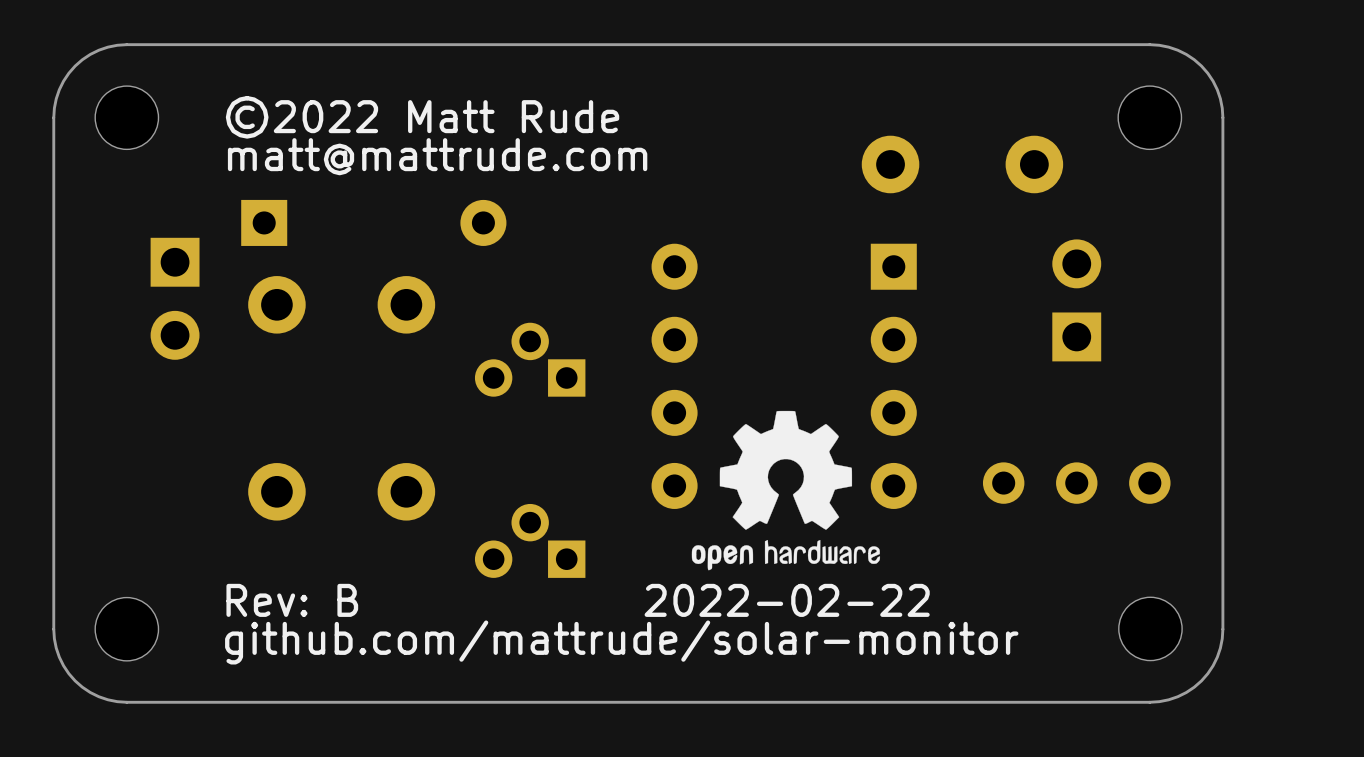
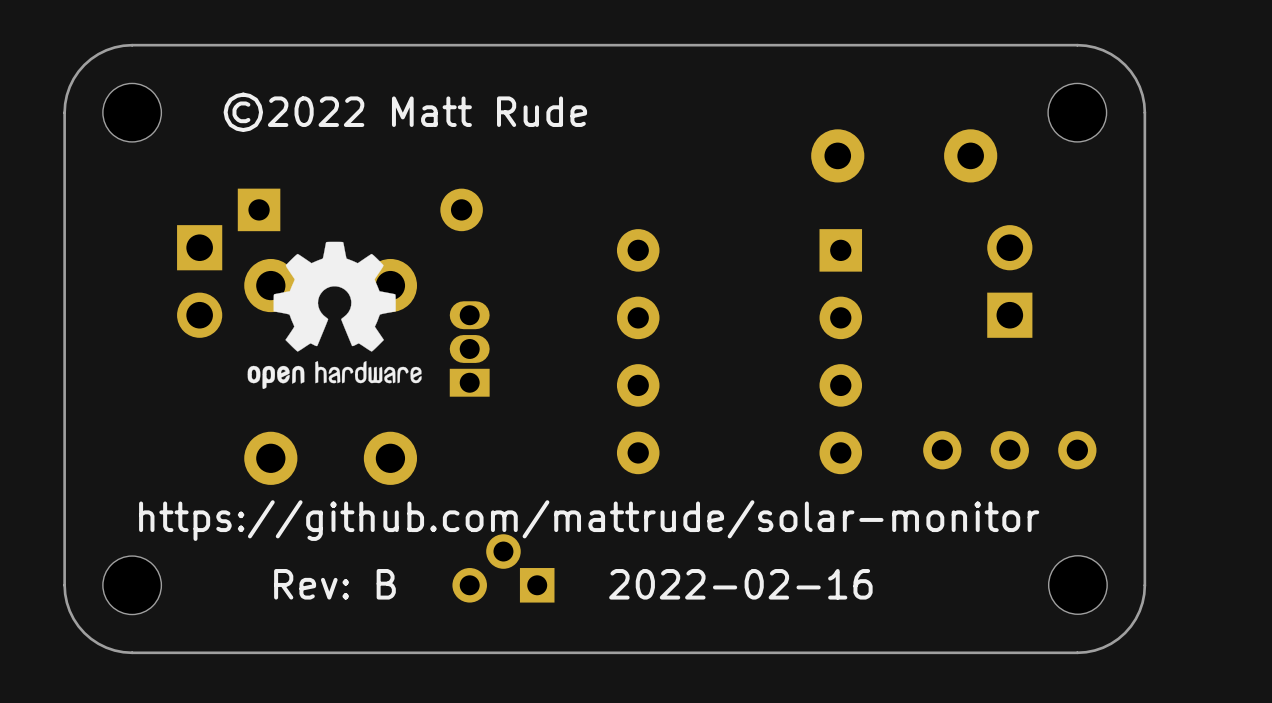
text: matt@mattrude.com (437, 156) -> none
part position: (175, 298) -> (199, 281)
part: (530, 359) -> none
part: none -> (469, 348)
drawing position: (785, 490) -> (334, 315)
part position: (530, 540) -> (503, 568)
text: none -> https://github.com/mattrude/solar-monitor (589, 520)
text position: Rev: B (292, 600) -> Rev: B (334, 584)
text: 2022-02-22 (787, 600) -> 2022-02-16 (740, 584)
text: github.com/mattrude/solar-monitor (621, 642) -> none

